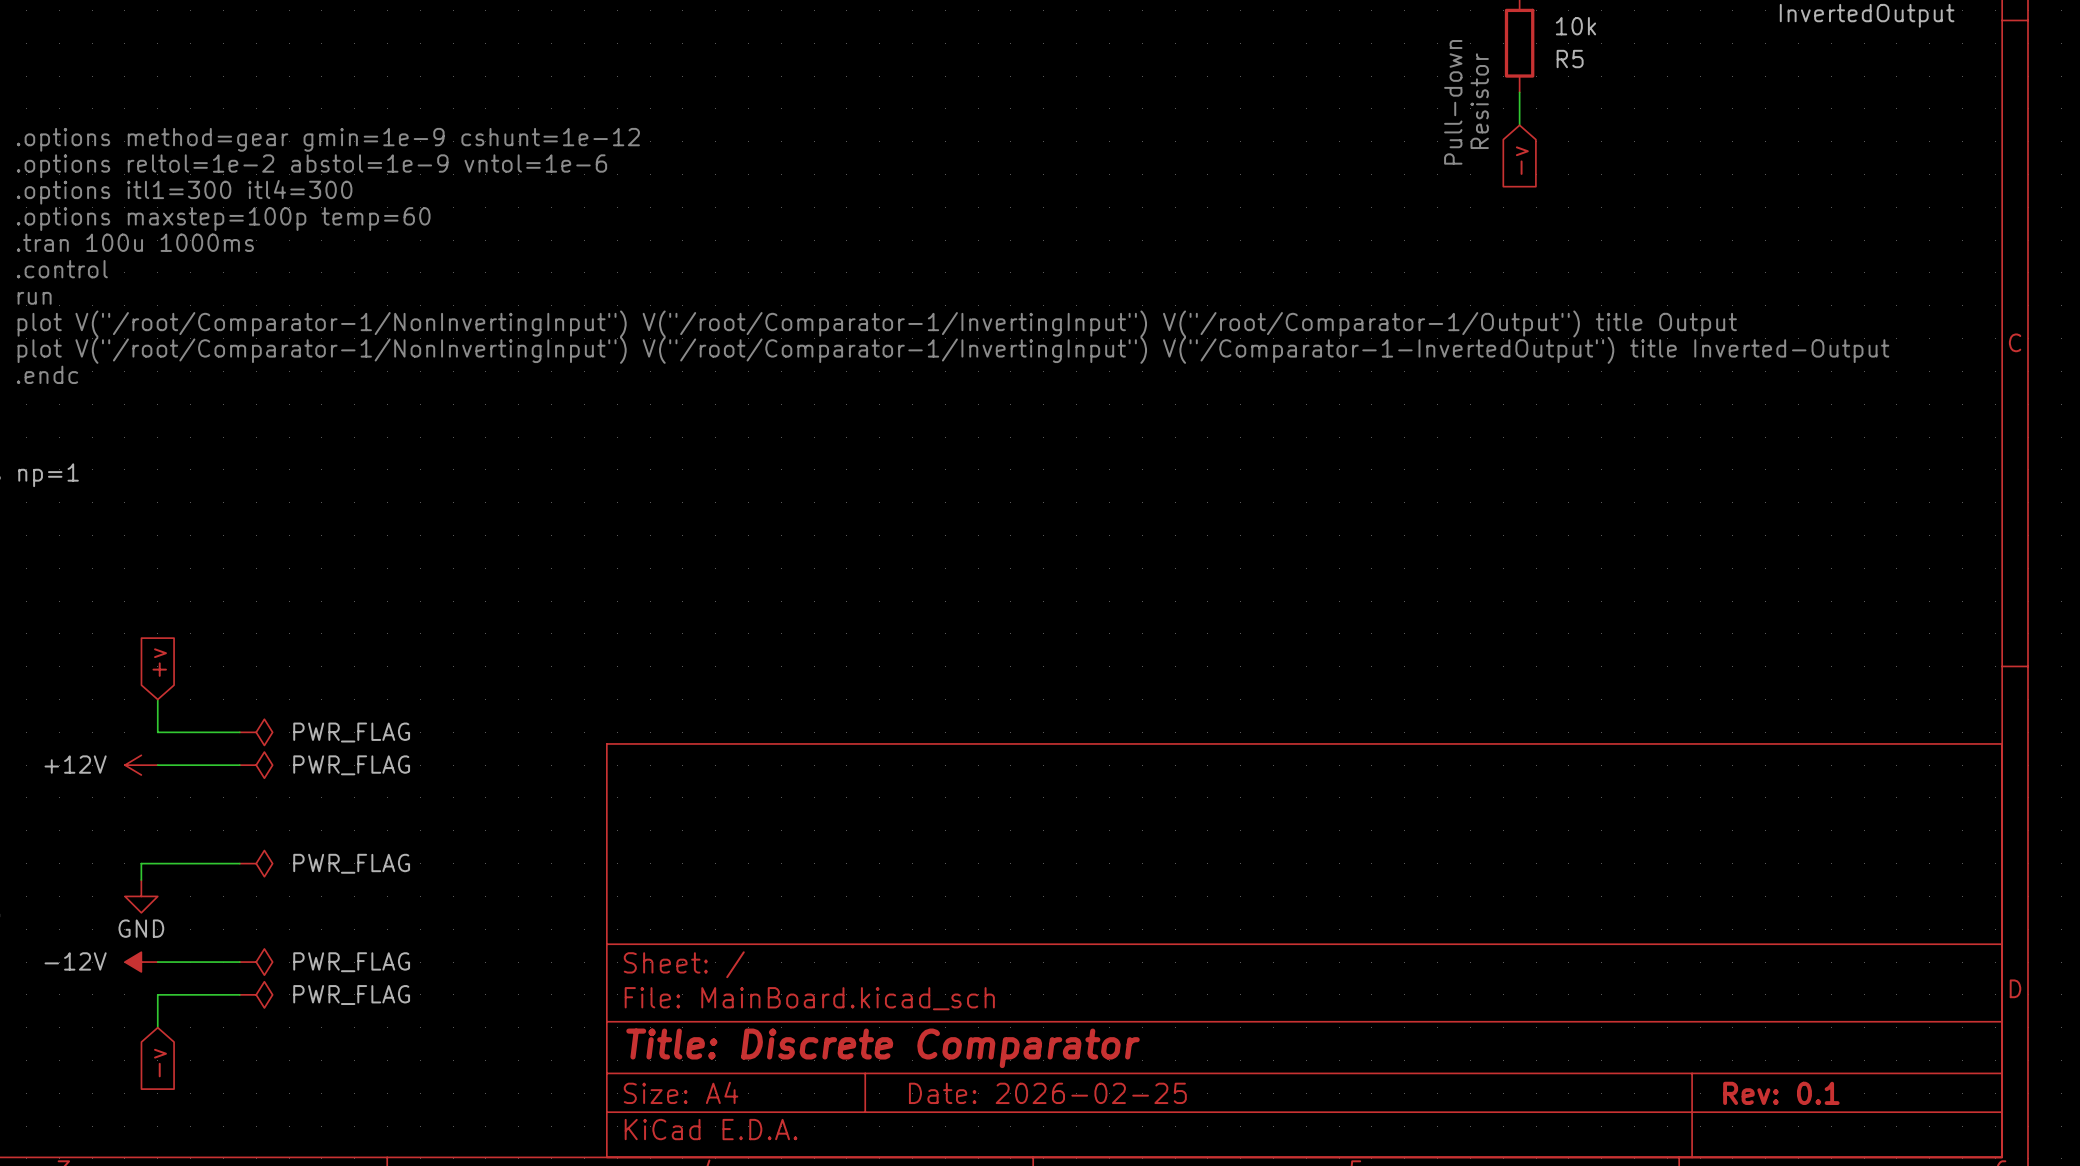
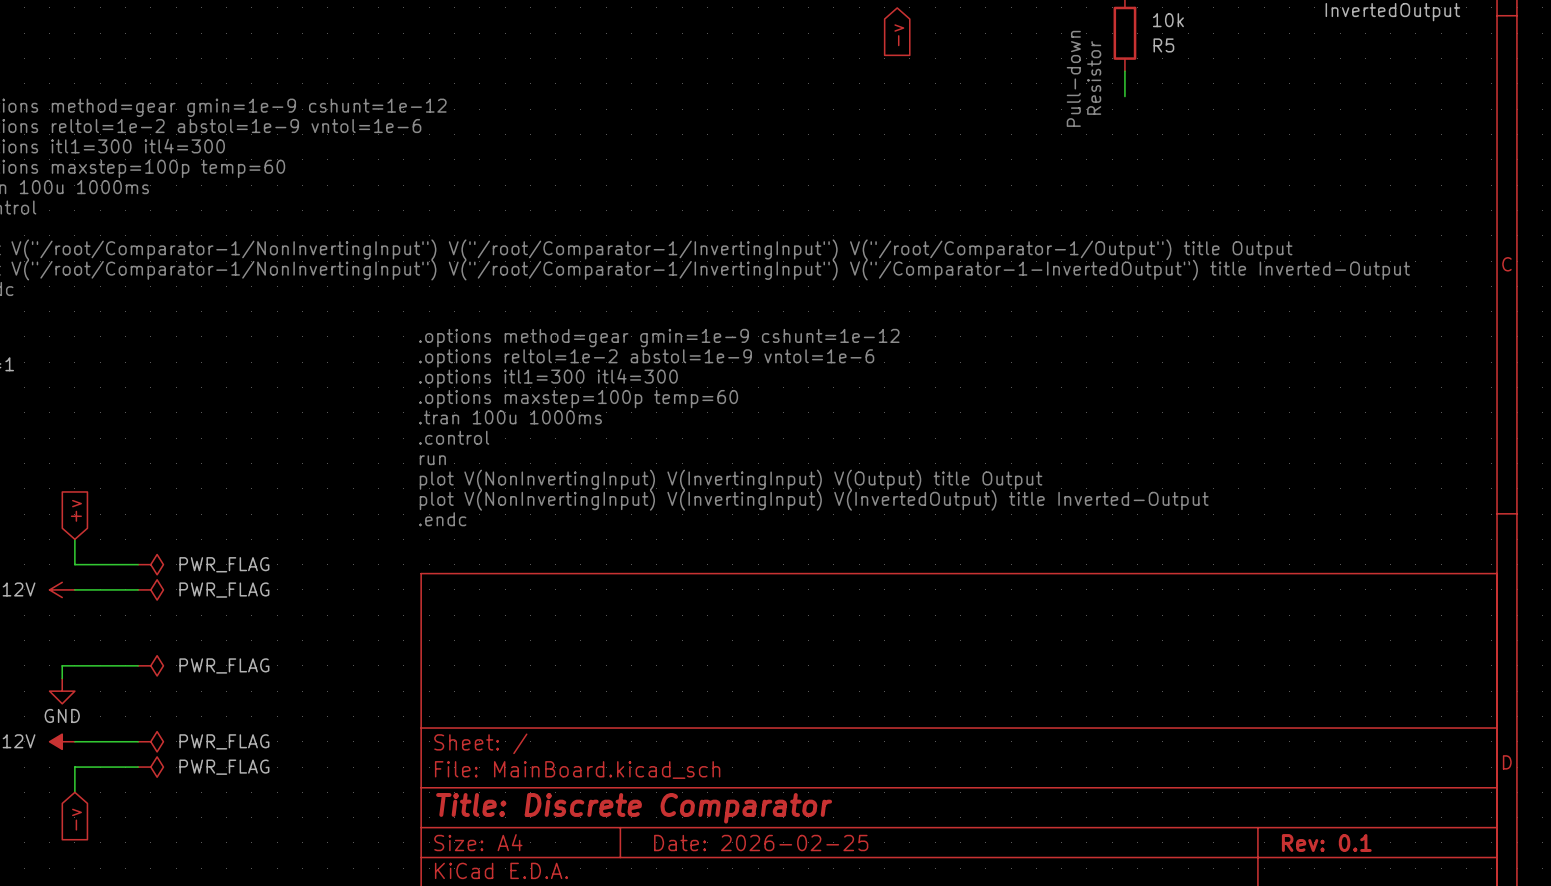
global label position: -v (1522, 160) -> -v (899, 35)
text: none -> .options method=gear gmin=1e-9 cshunt=1e-12 (659, 338)
text: none -> .options reltol=1e-2 abstol=1e-9 vntol=1e-6 (646, 358)
text: none -> .options itl1=300 itl4=300 (548, 378)
text: none -> .options maxstep=100p temp=60 (578, 399)
text: none -> .tran 100u 1000ms (510, 417)
text: none -> .control (454, 437)
text: none -> run (432, 460)
text: none -> plot V(NonInvertingInput) V(InvertingInput) V(Output) title Output (731, 480)
text: none -> plot V(NonInvertingInput) V(InvertingInput) V(InvertedOutput) title Inverted-Output (814, 500)
text: none -> .endc (442, 519)

